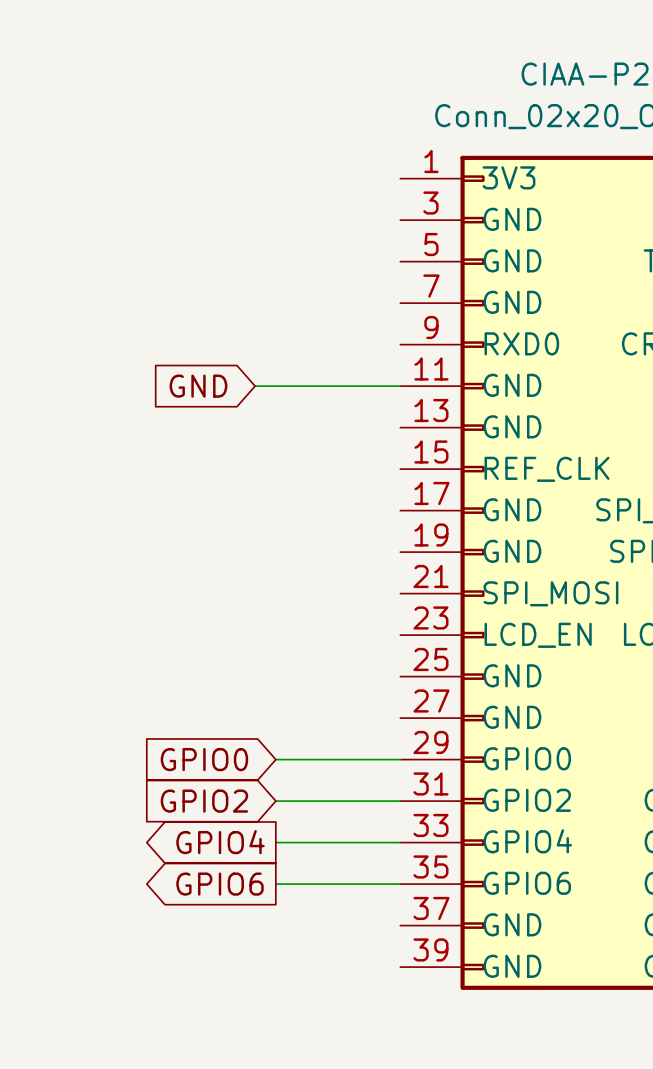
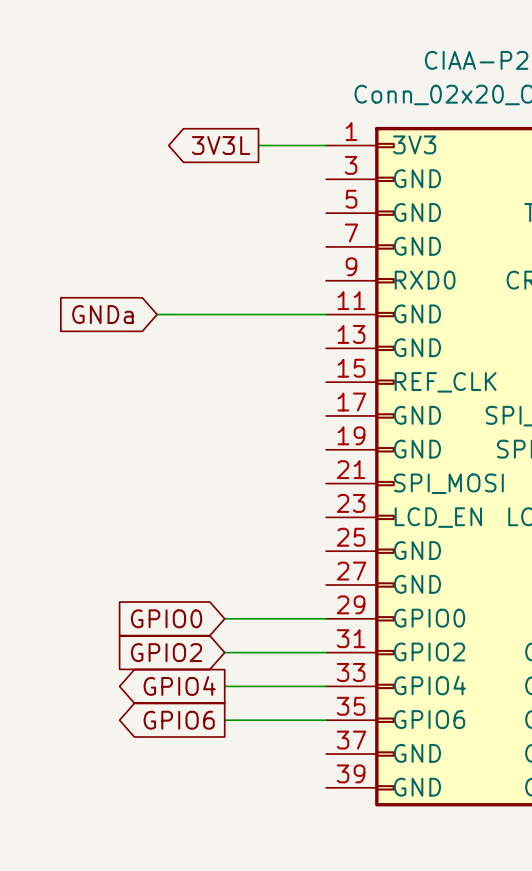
global label: none -> 3V3L (221, 145)
wire: none -> (258, 145) (326, 145)
wire: none -> (157, 314) (207, 314)
global label: GND (198, 386) -> GNDa (102, 314)

